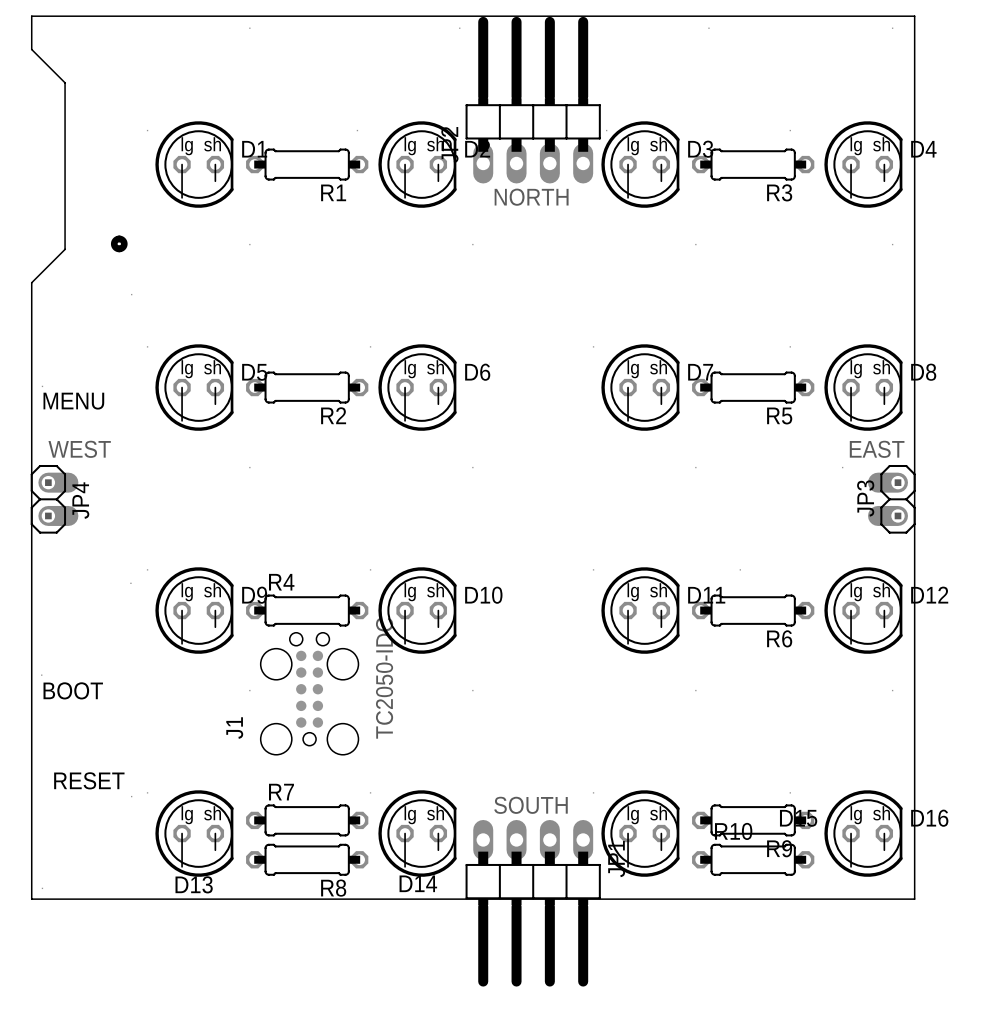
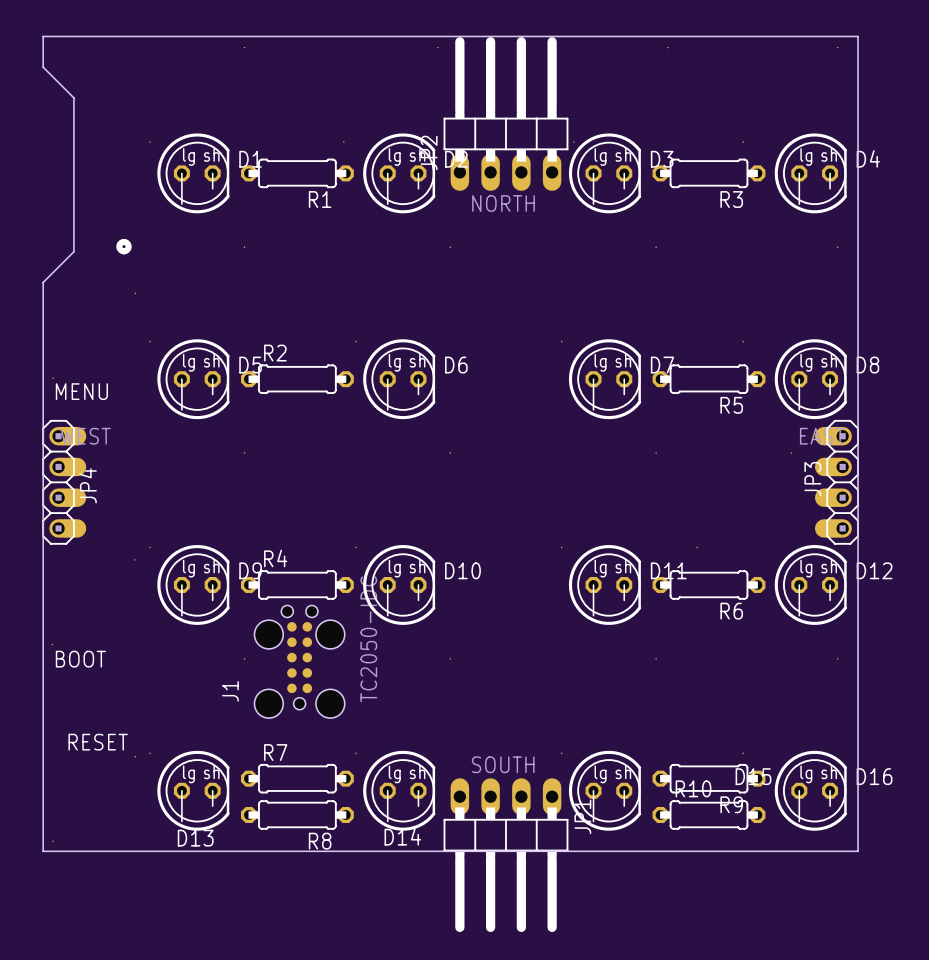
R2 name position: R2 (333, 415) -> R2 (275, 353)
JP4 footprint: [30, 464, 79, 534] -> [42, 419, 87, 545]
JP3 footprint: [868, 464, 916, 534] -> [814, 419, 859, 545]

